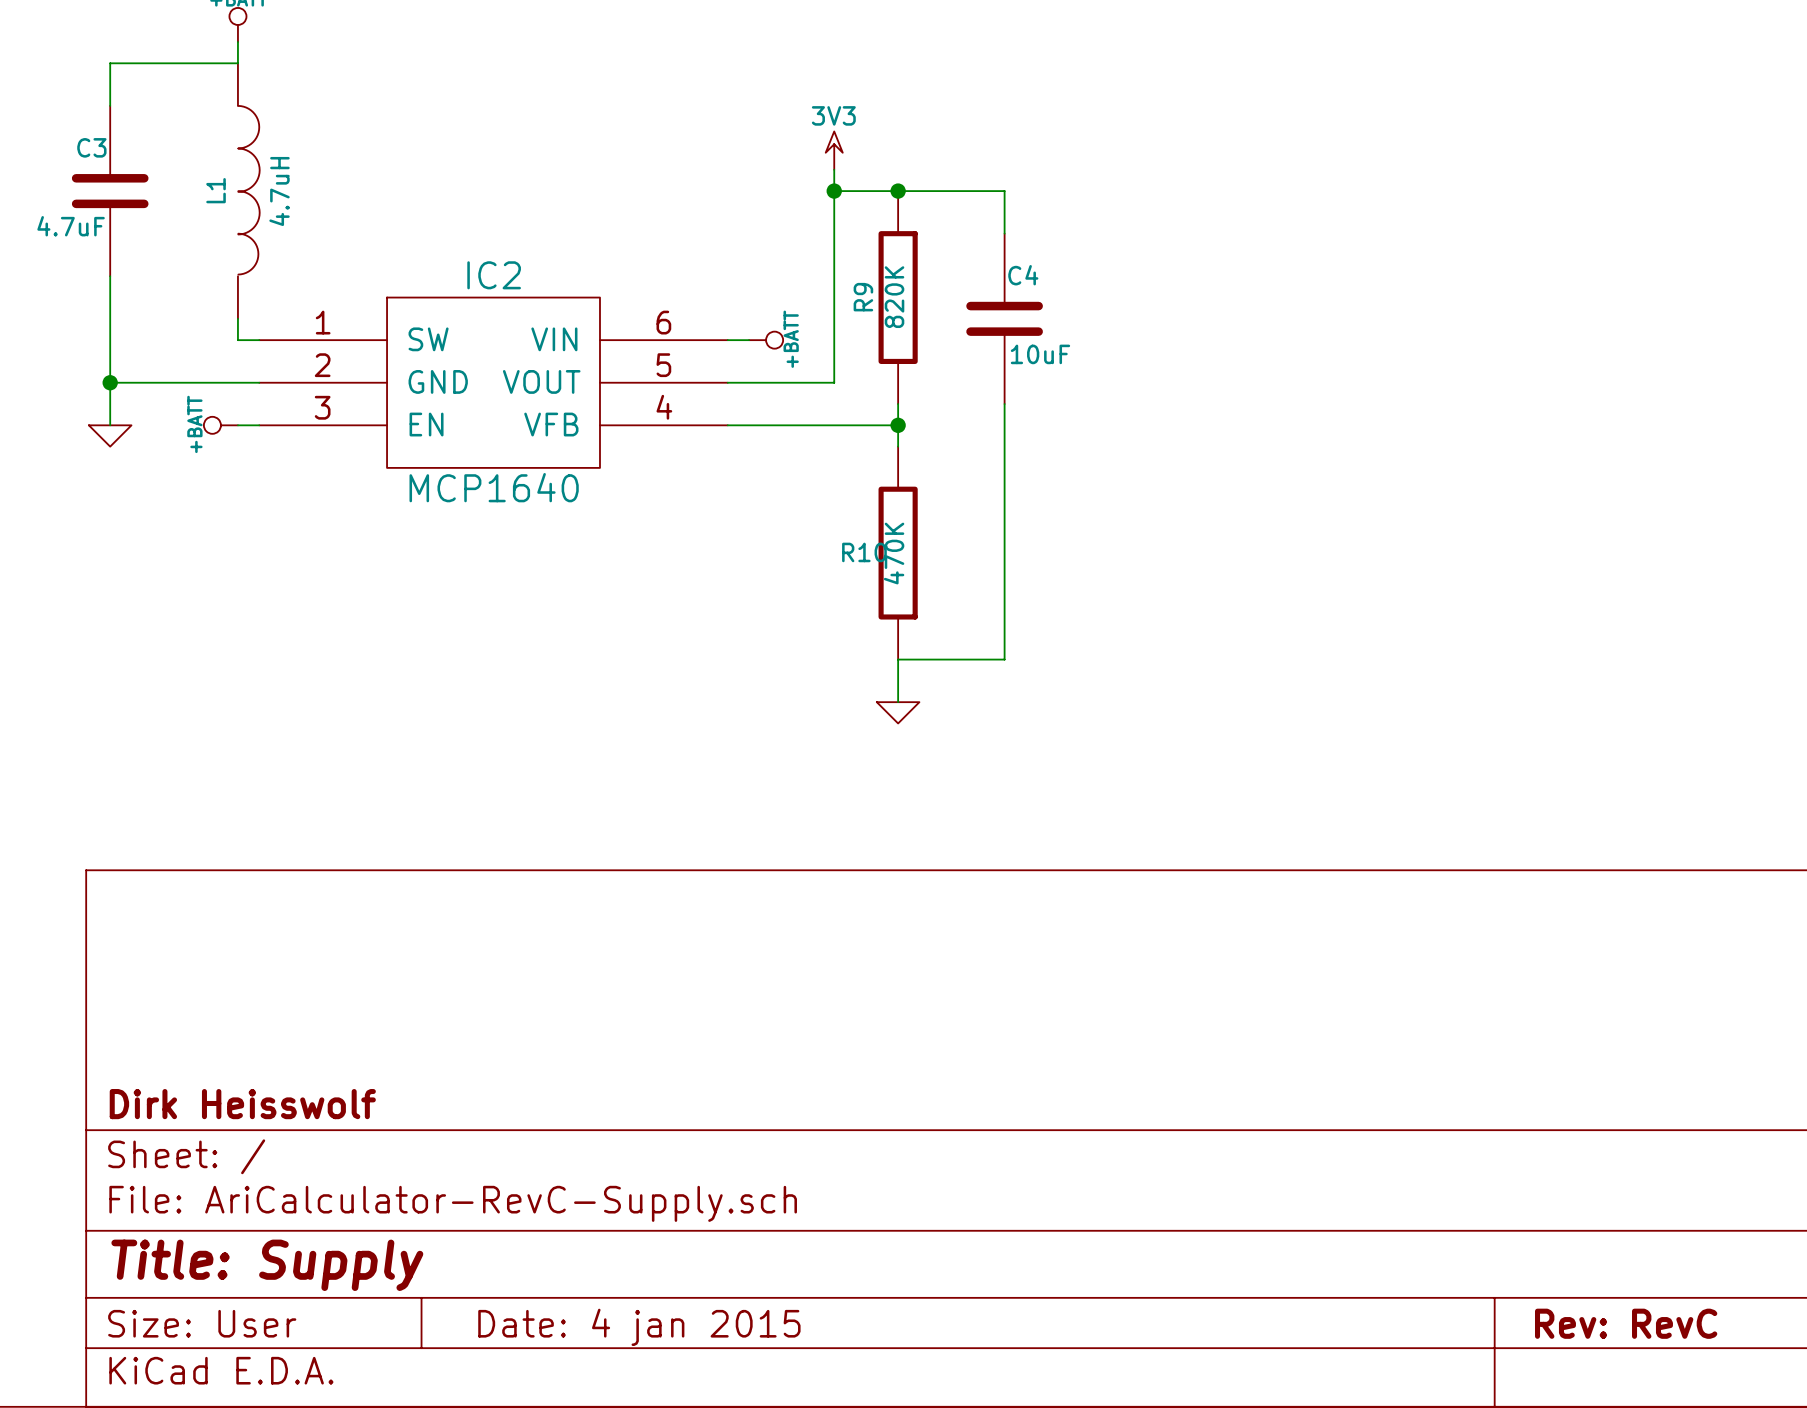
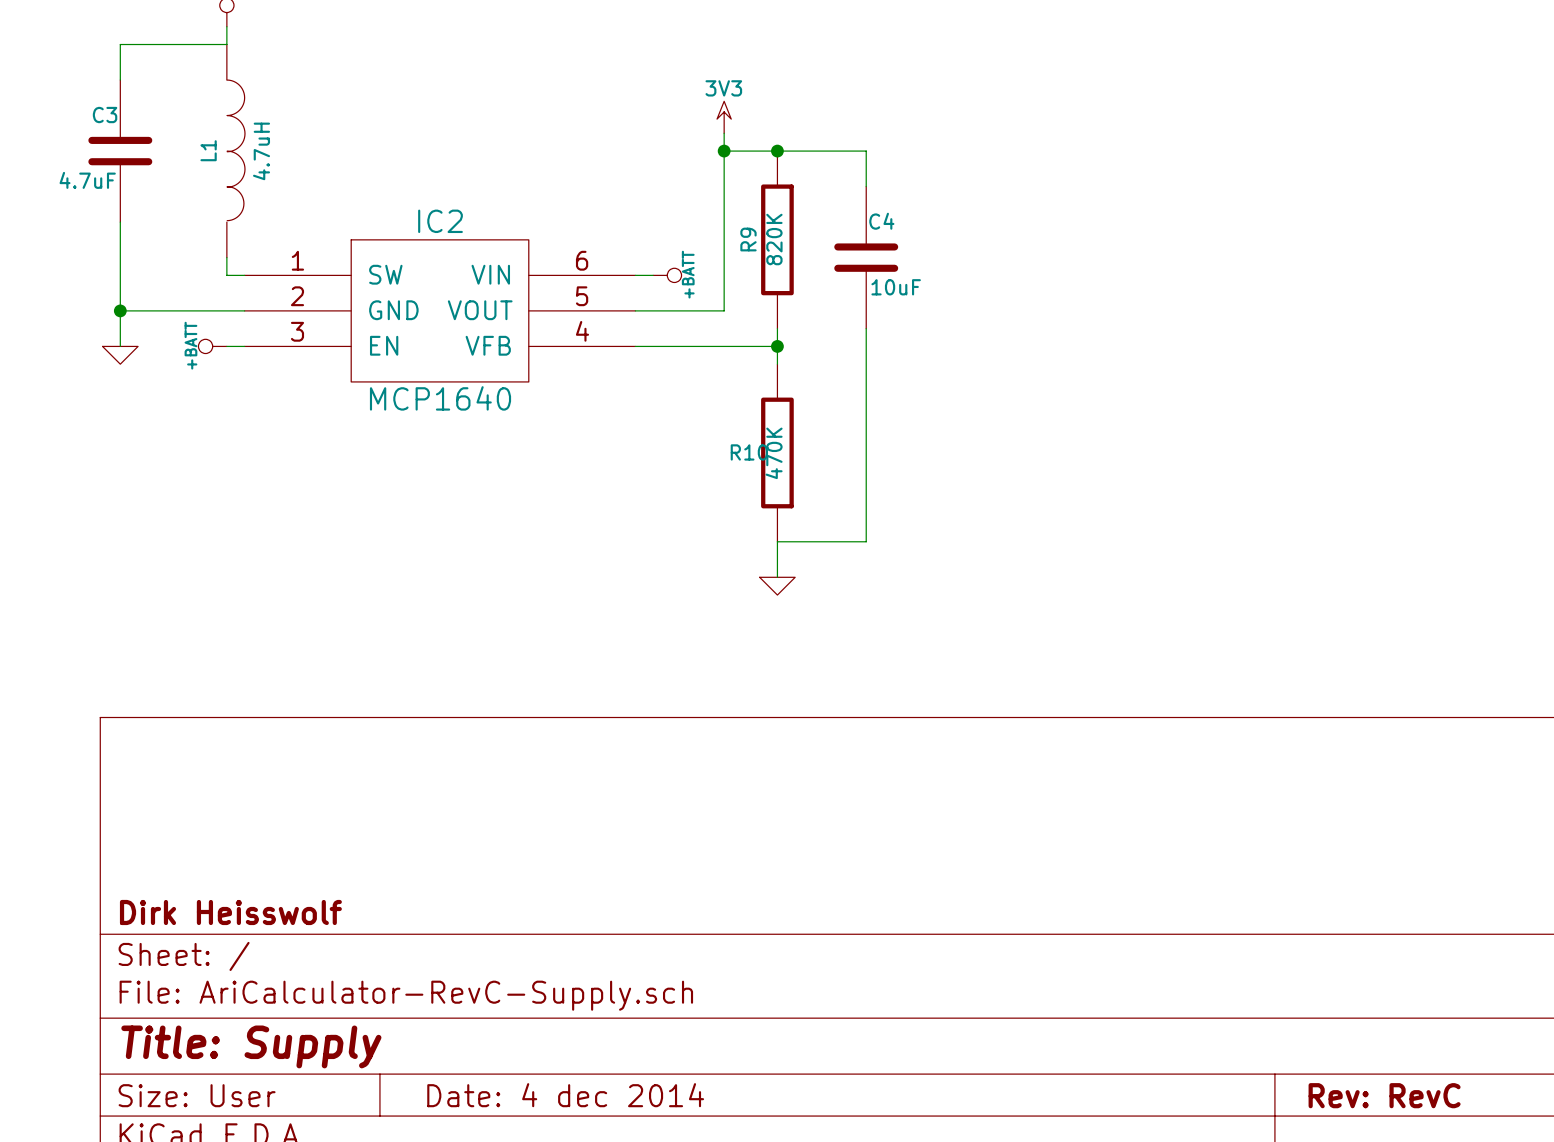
title block: Date: 4 jan 2015 (639, 1327) -> Date: 4 dec 2014 (565, 1095)

